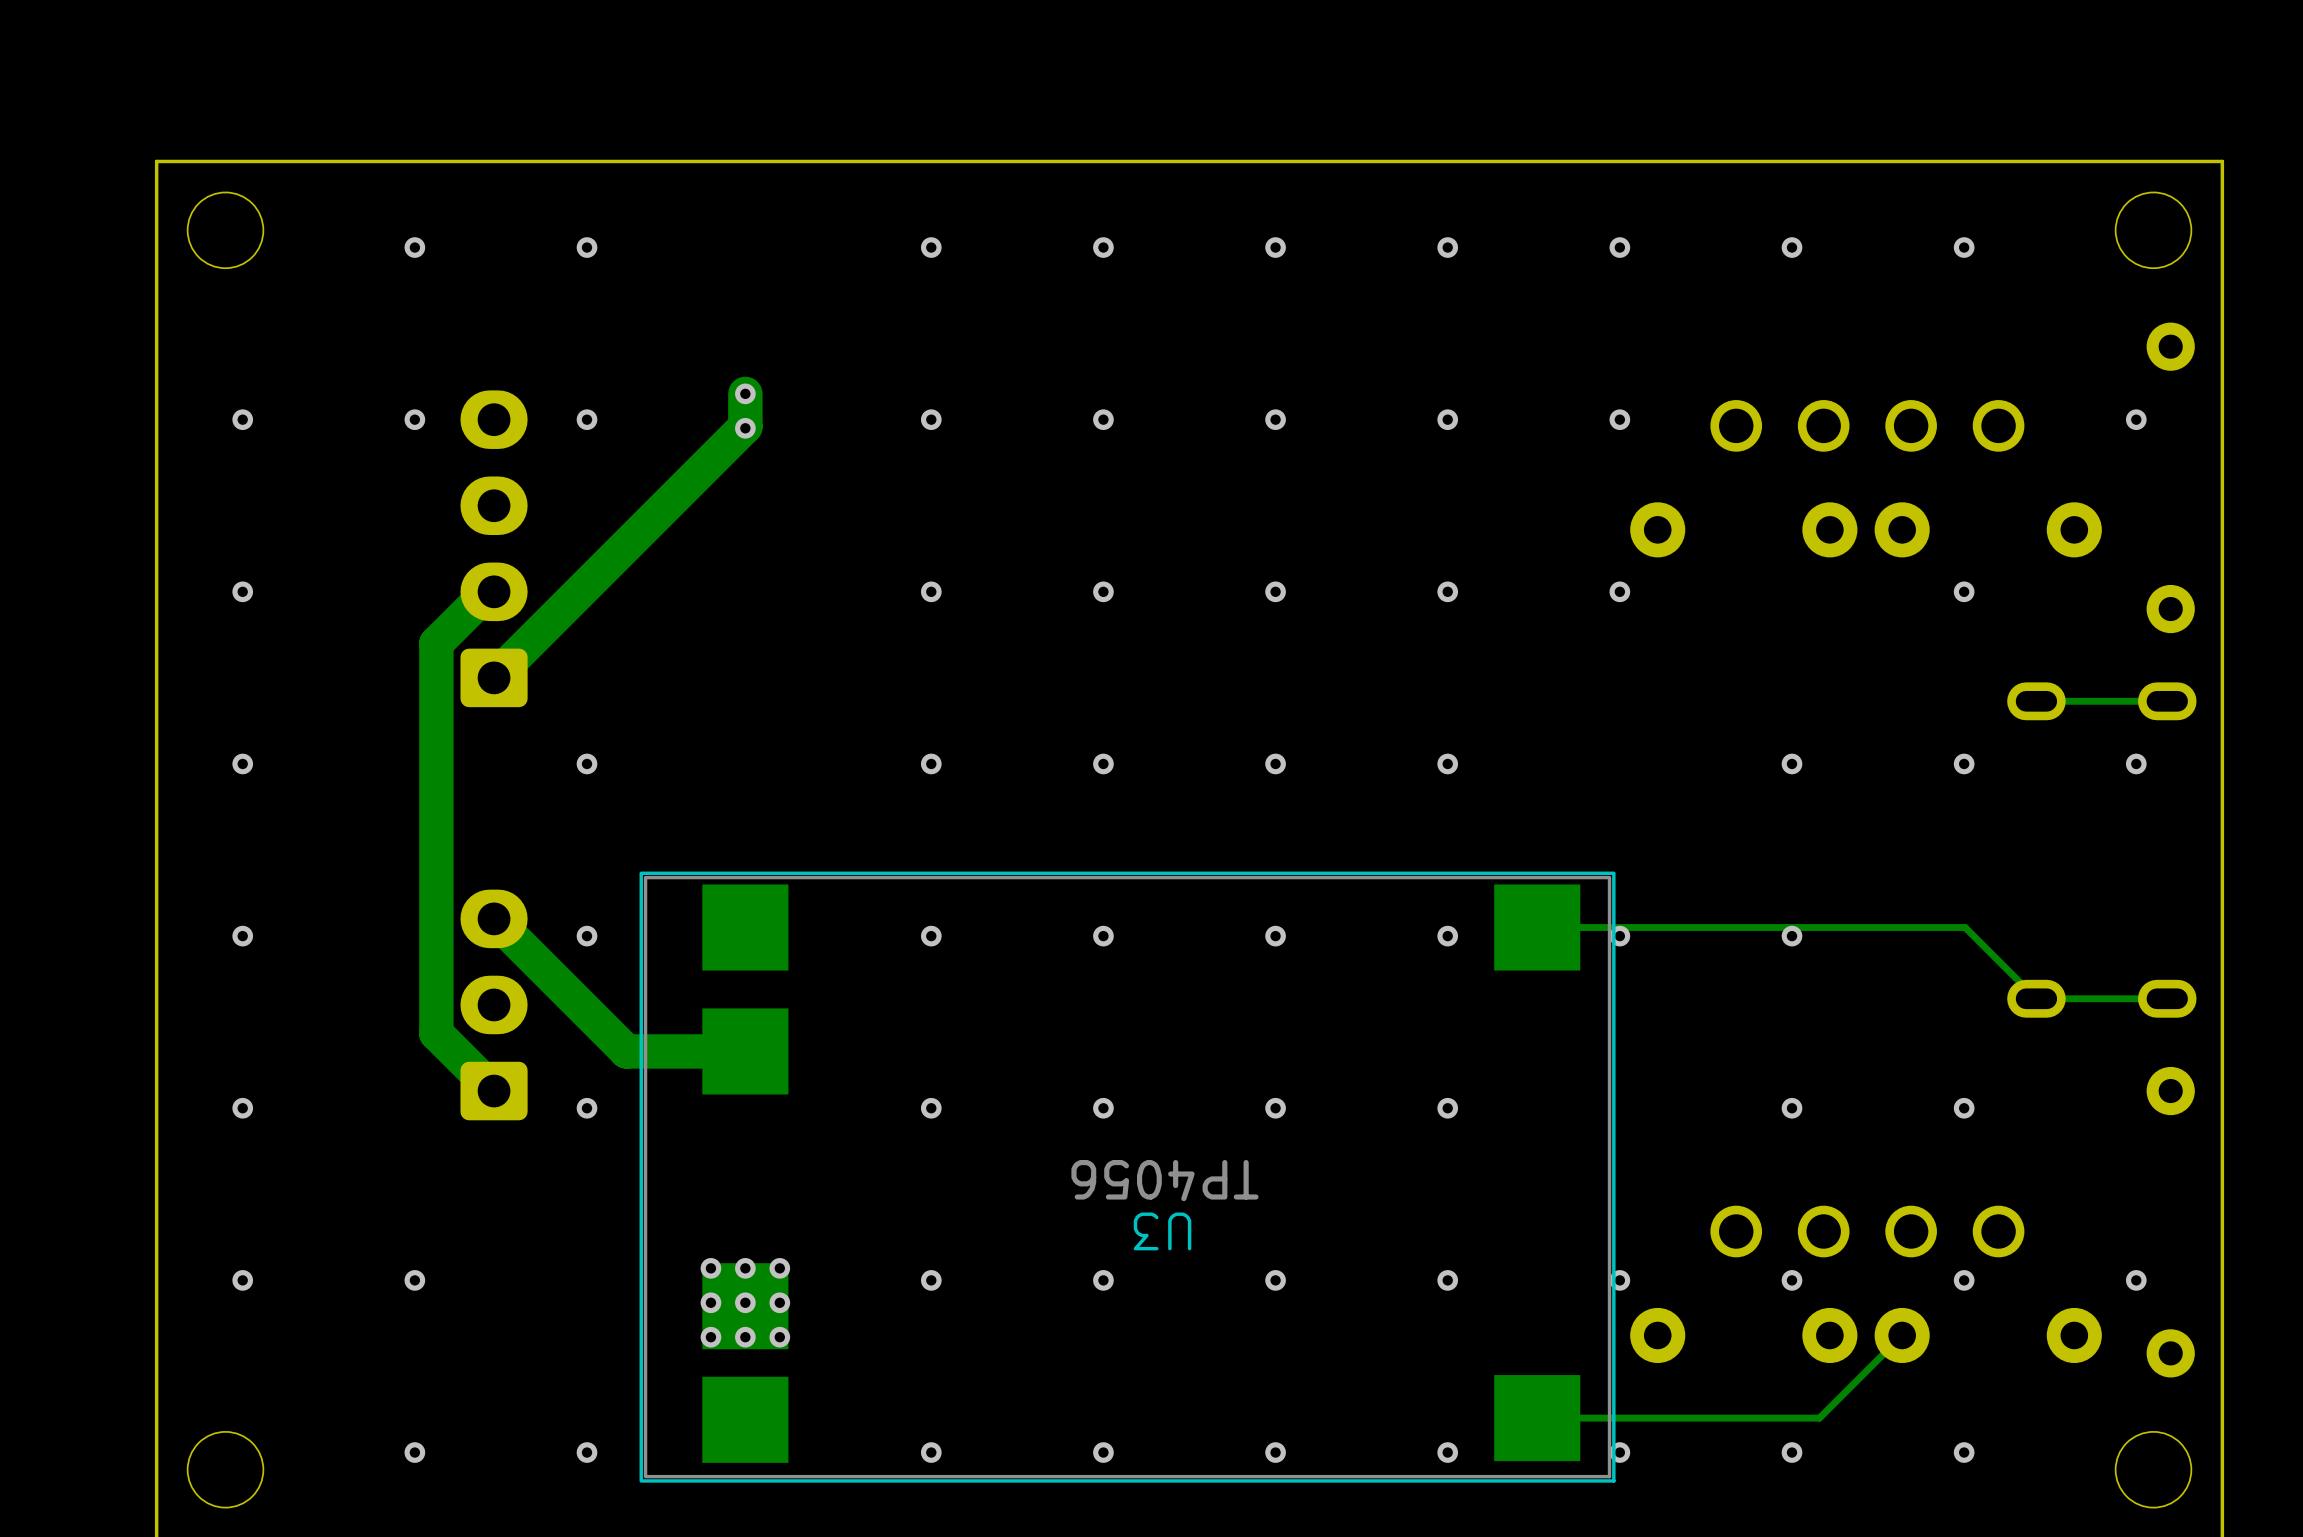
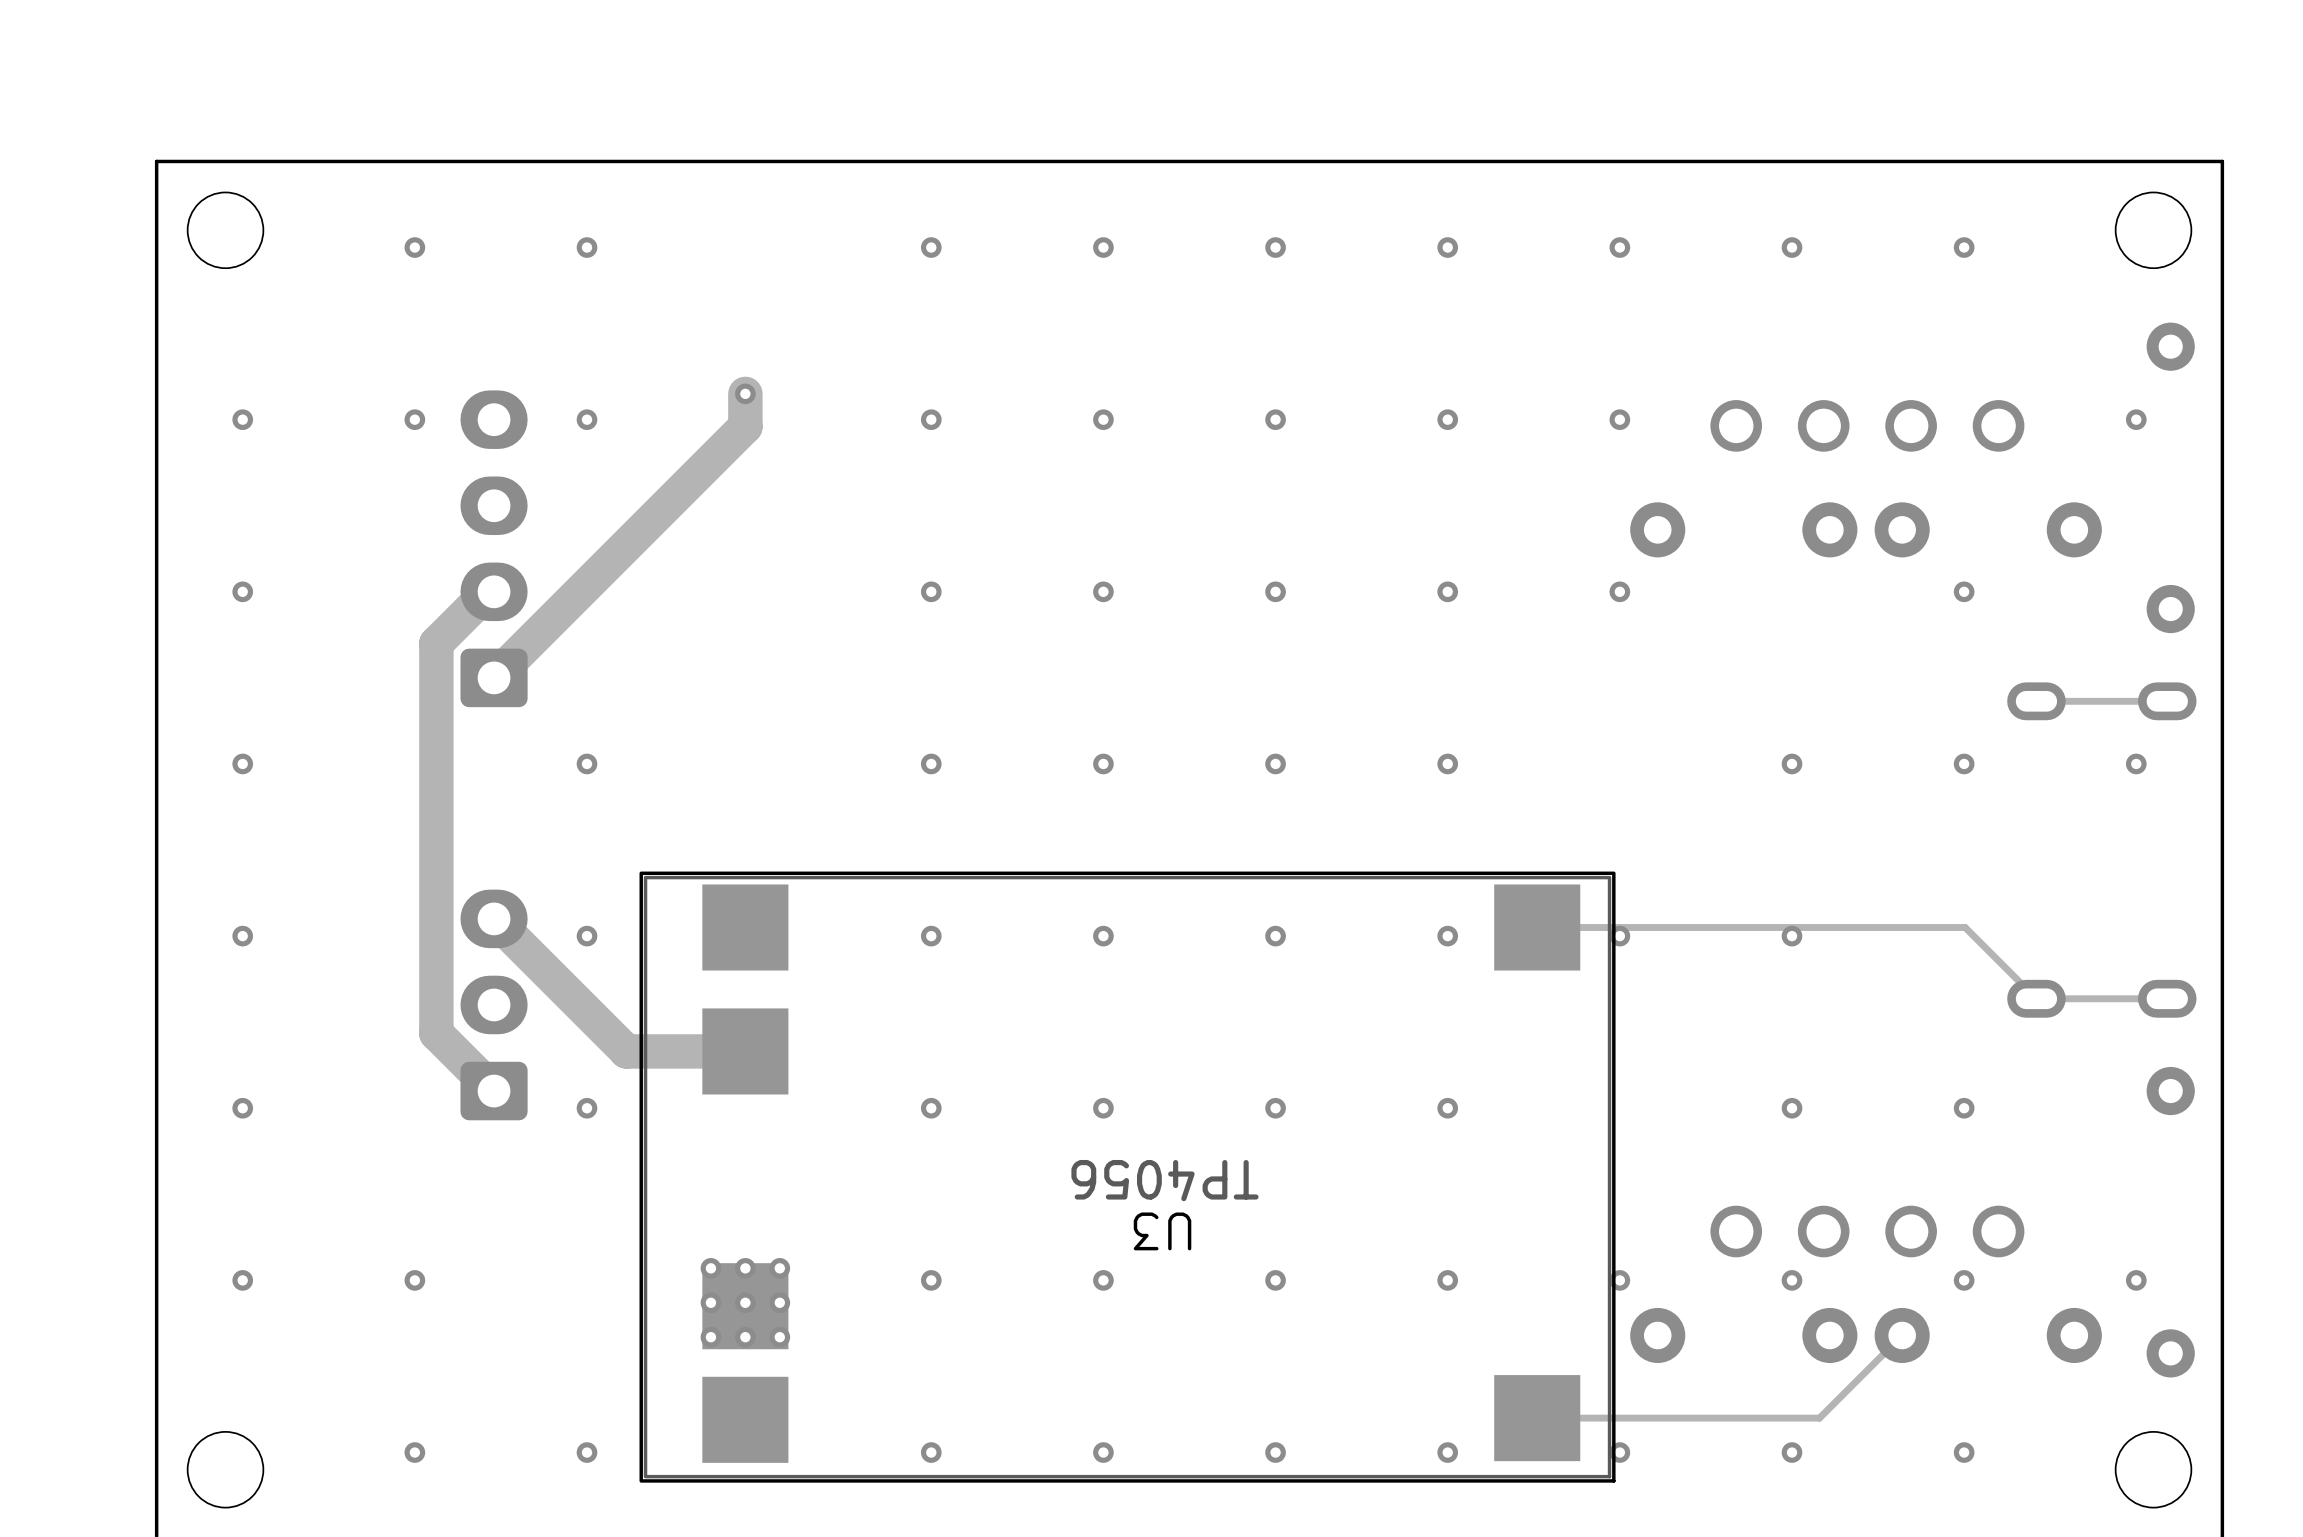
via: (745, 428) -> none

